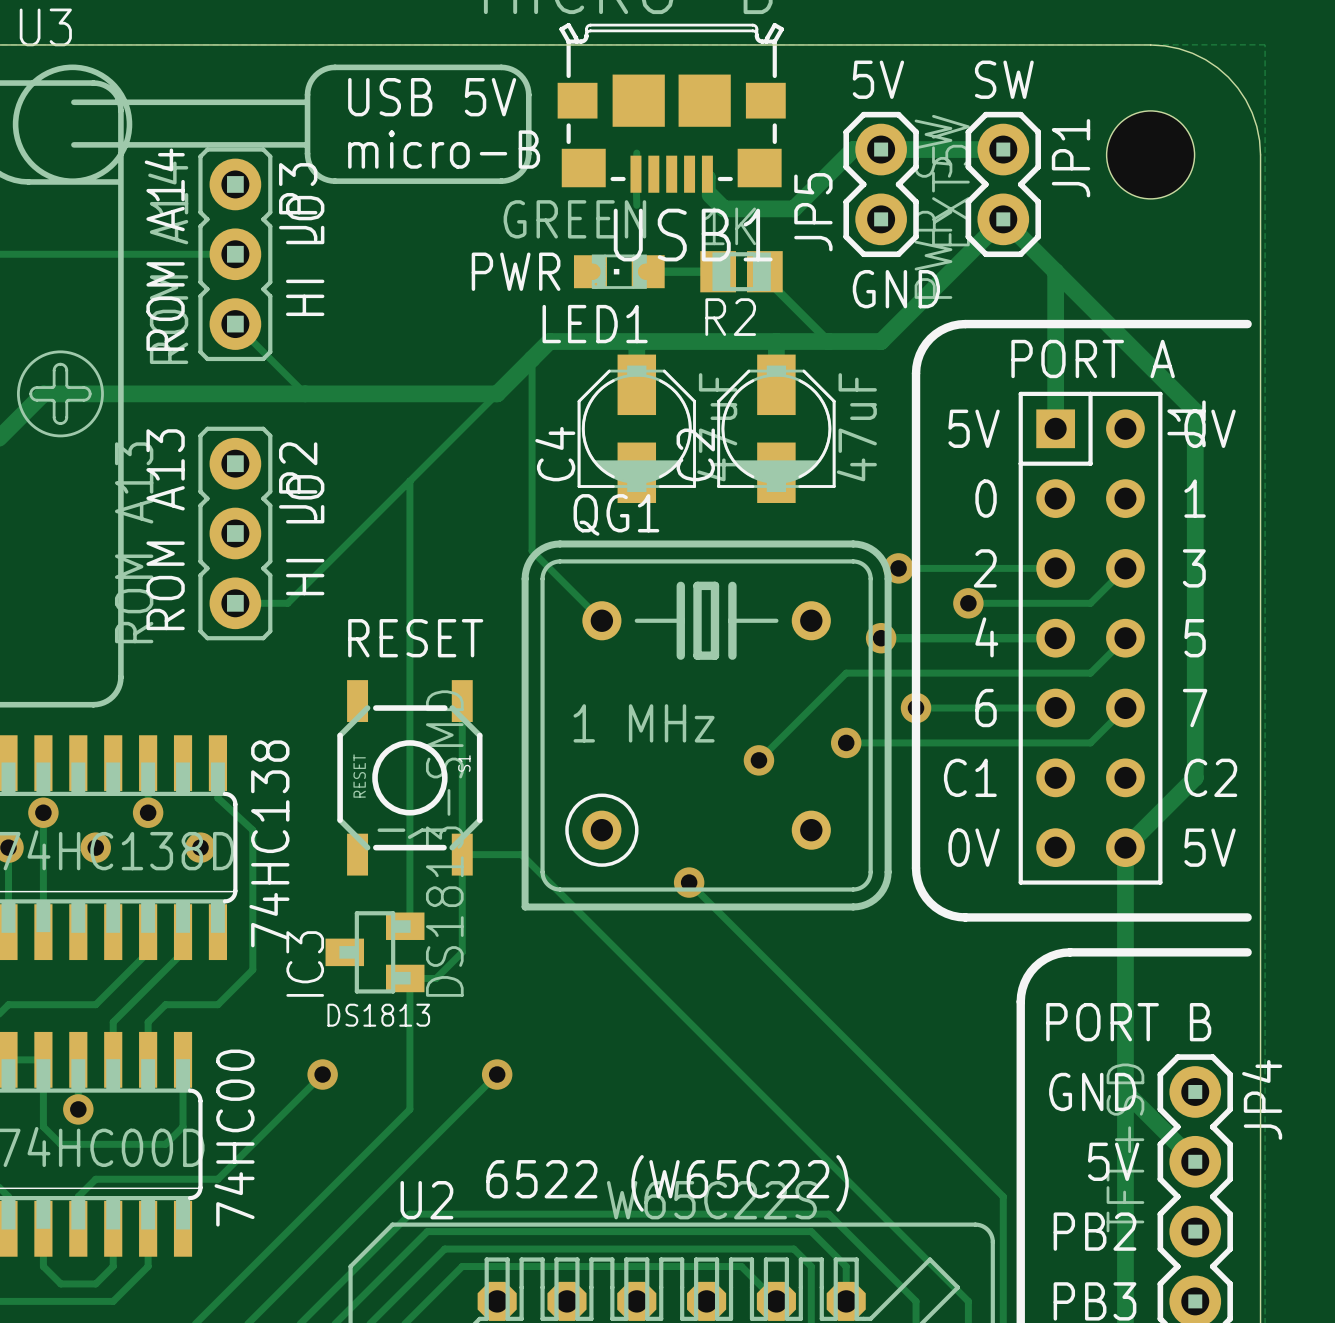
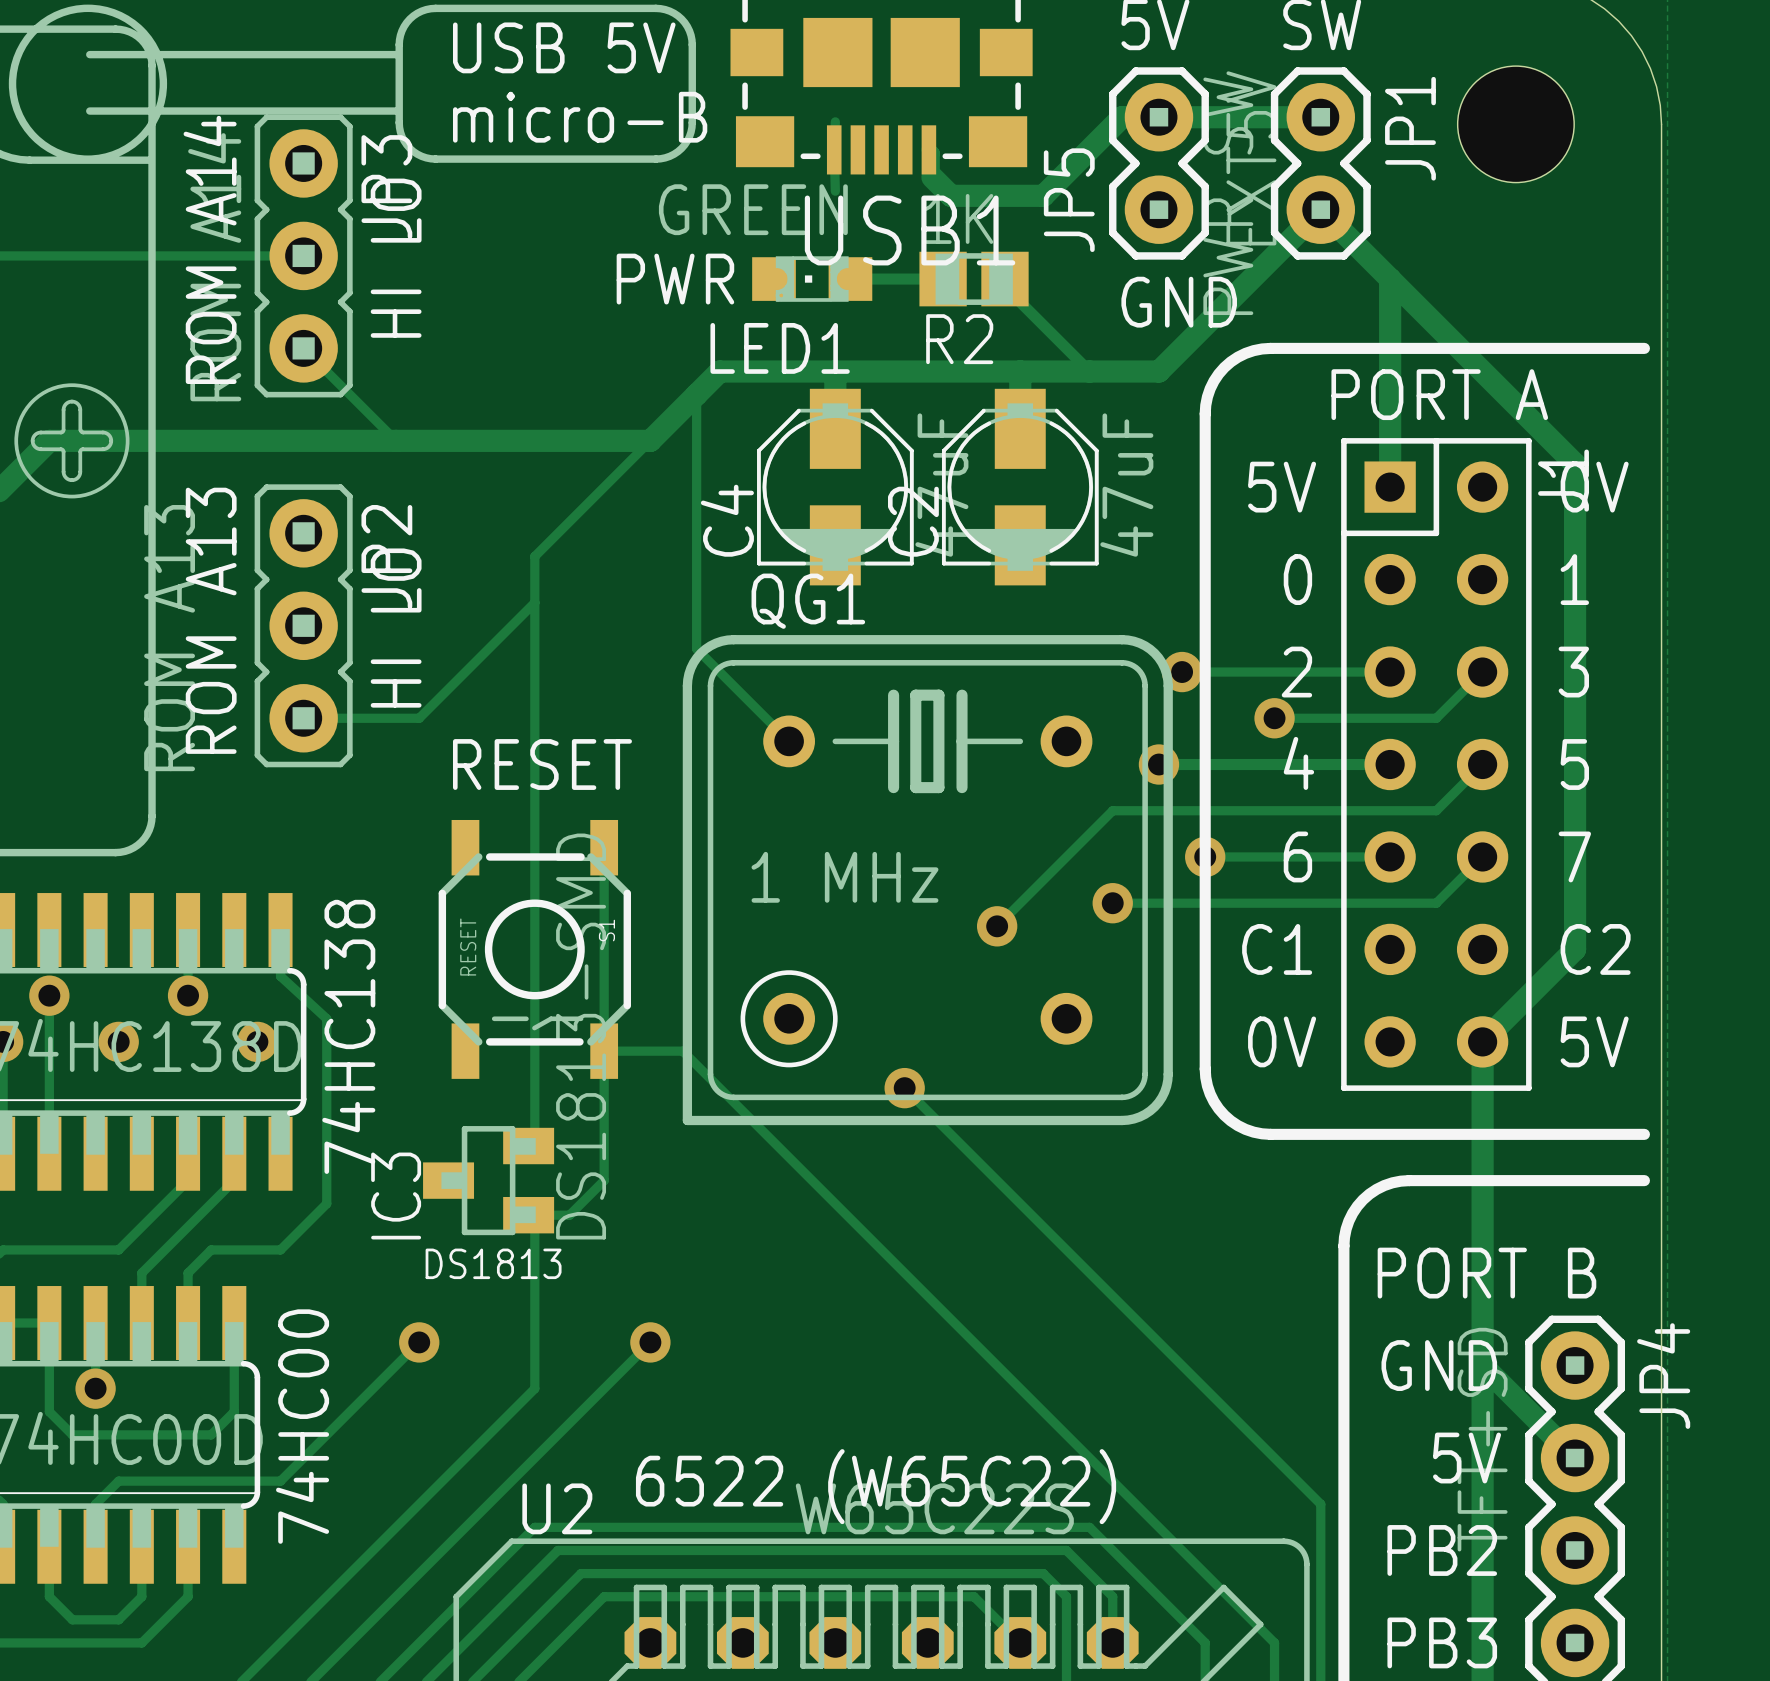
track: (409, 481) (287, 603) -> (534, 602) (419, 718) (373, 718)

